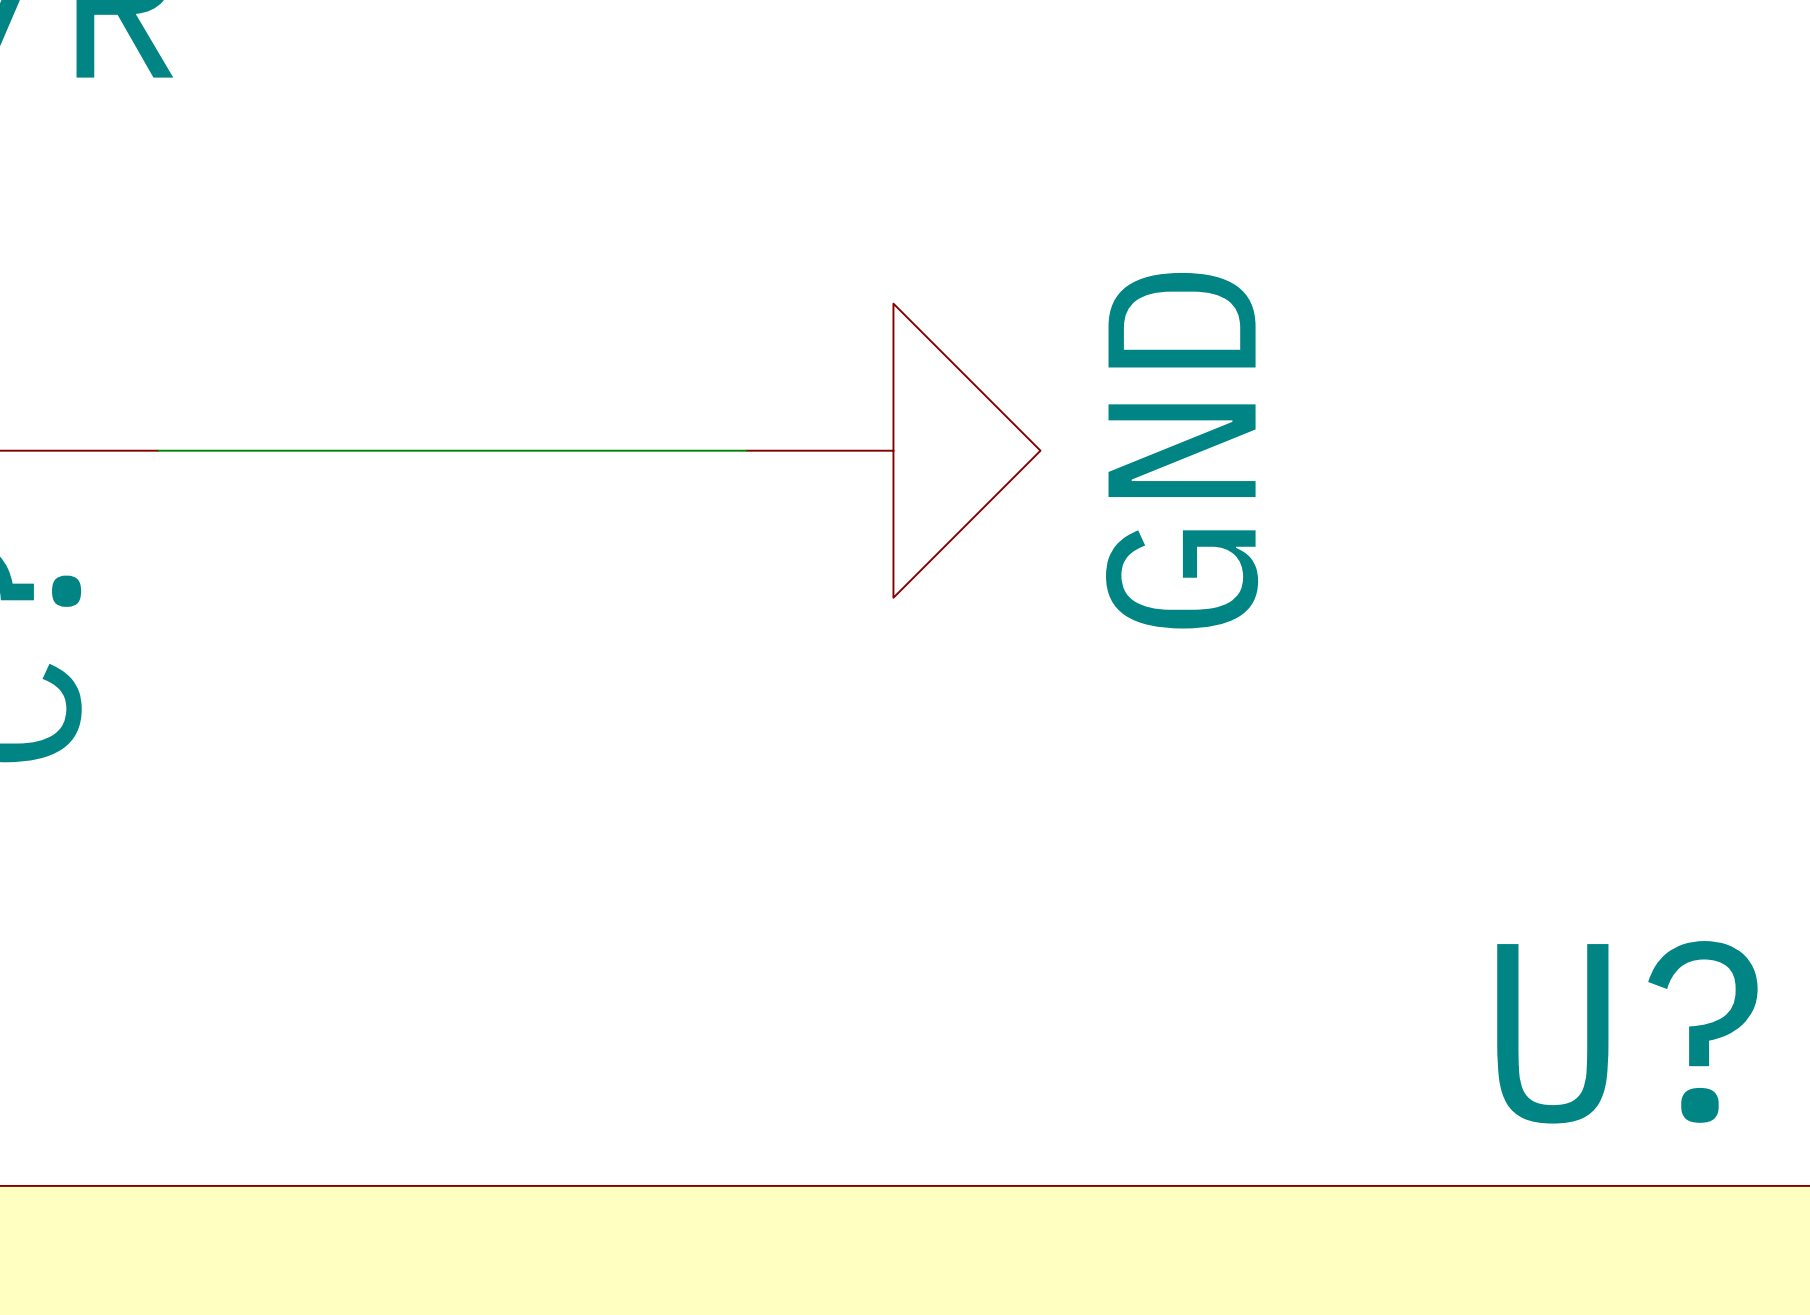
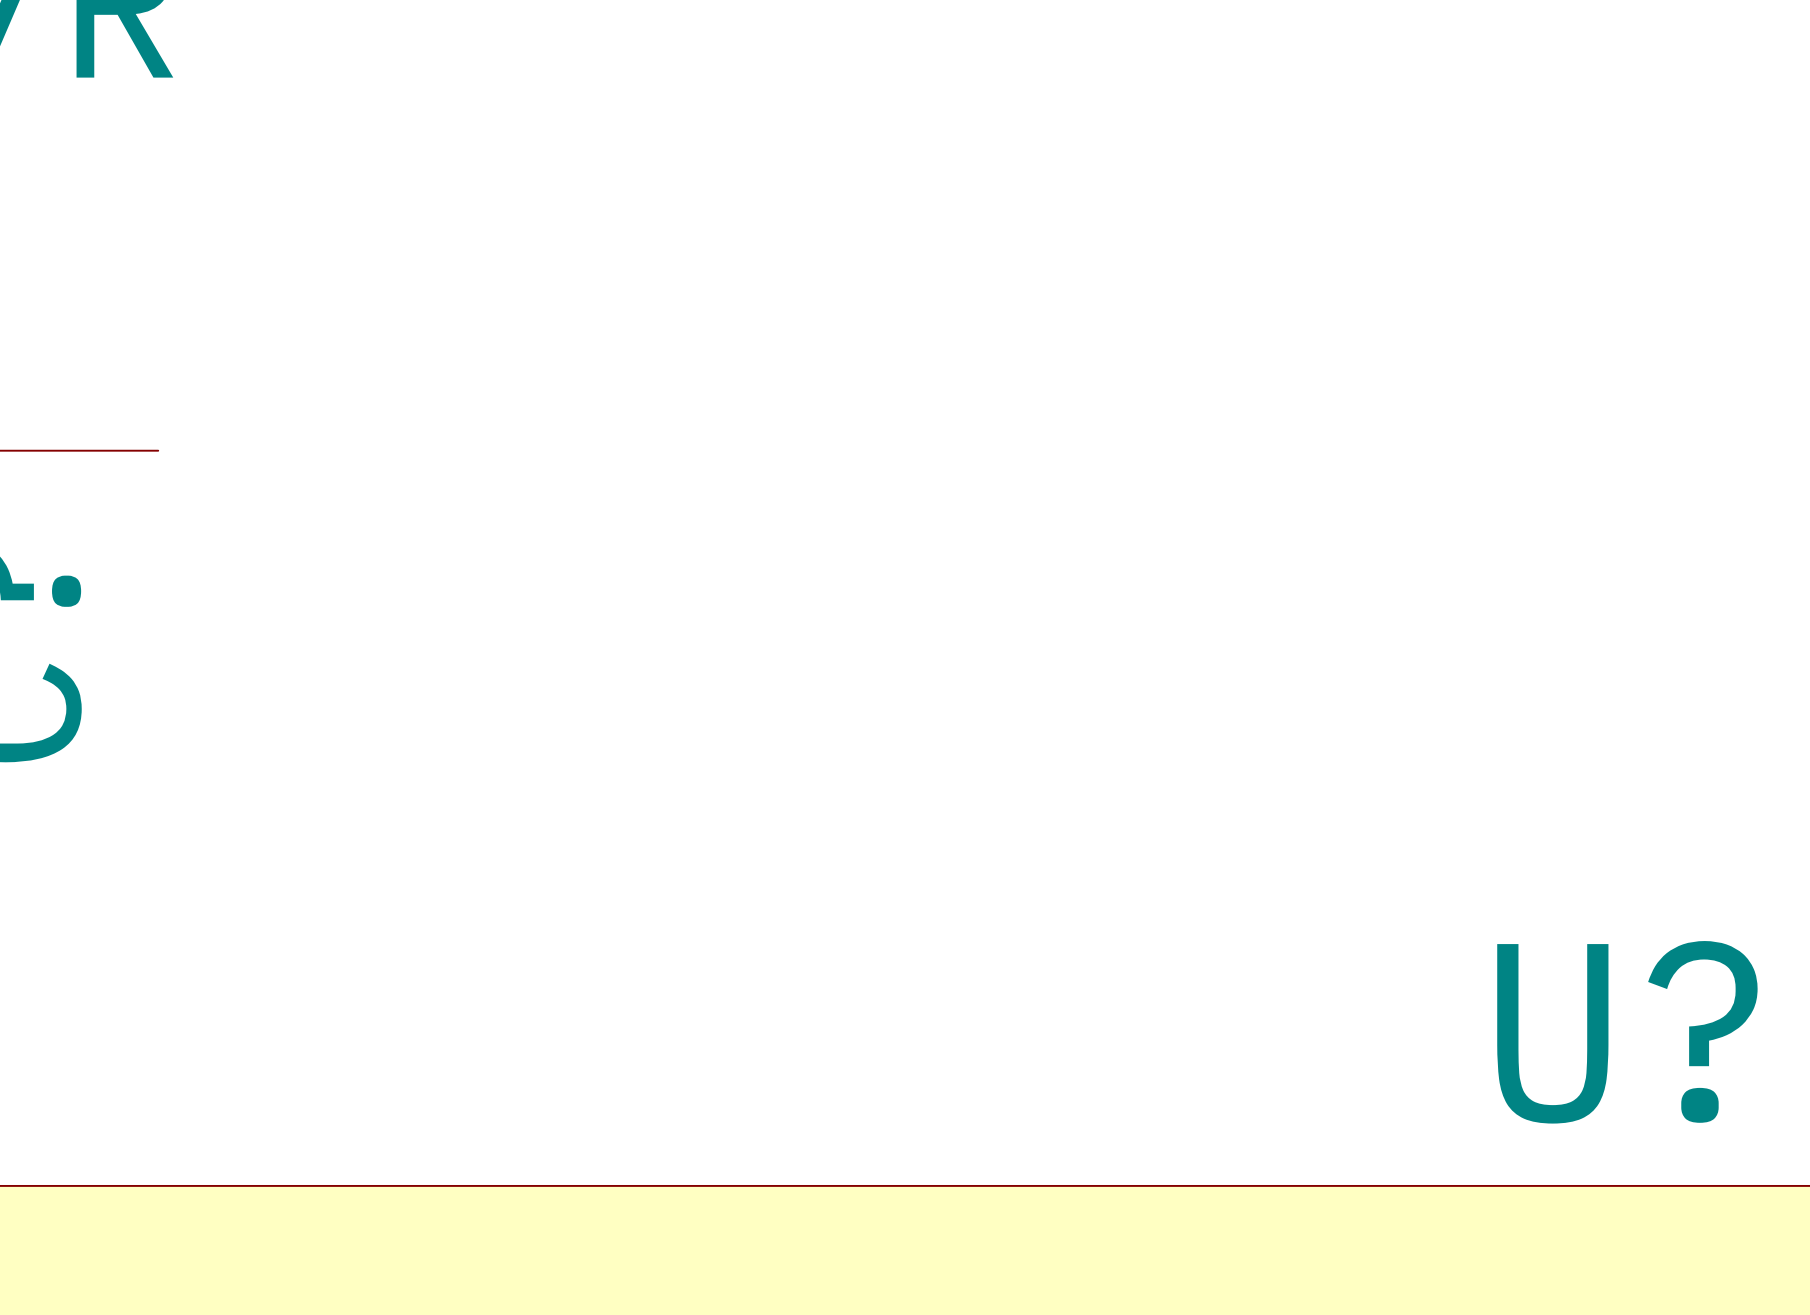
wire: (158, 450) (746, 450) -> none
power symbol: GND (893, 450) -> none

